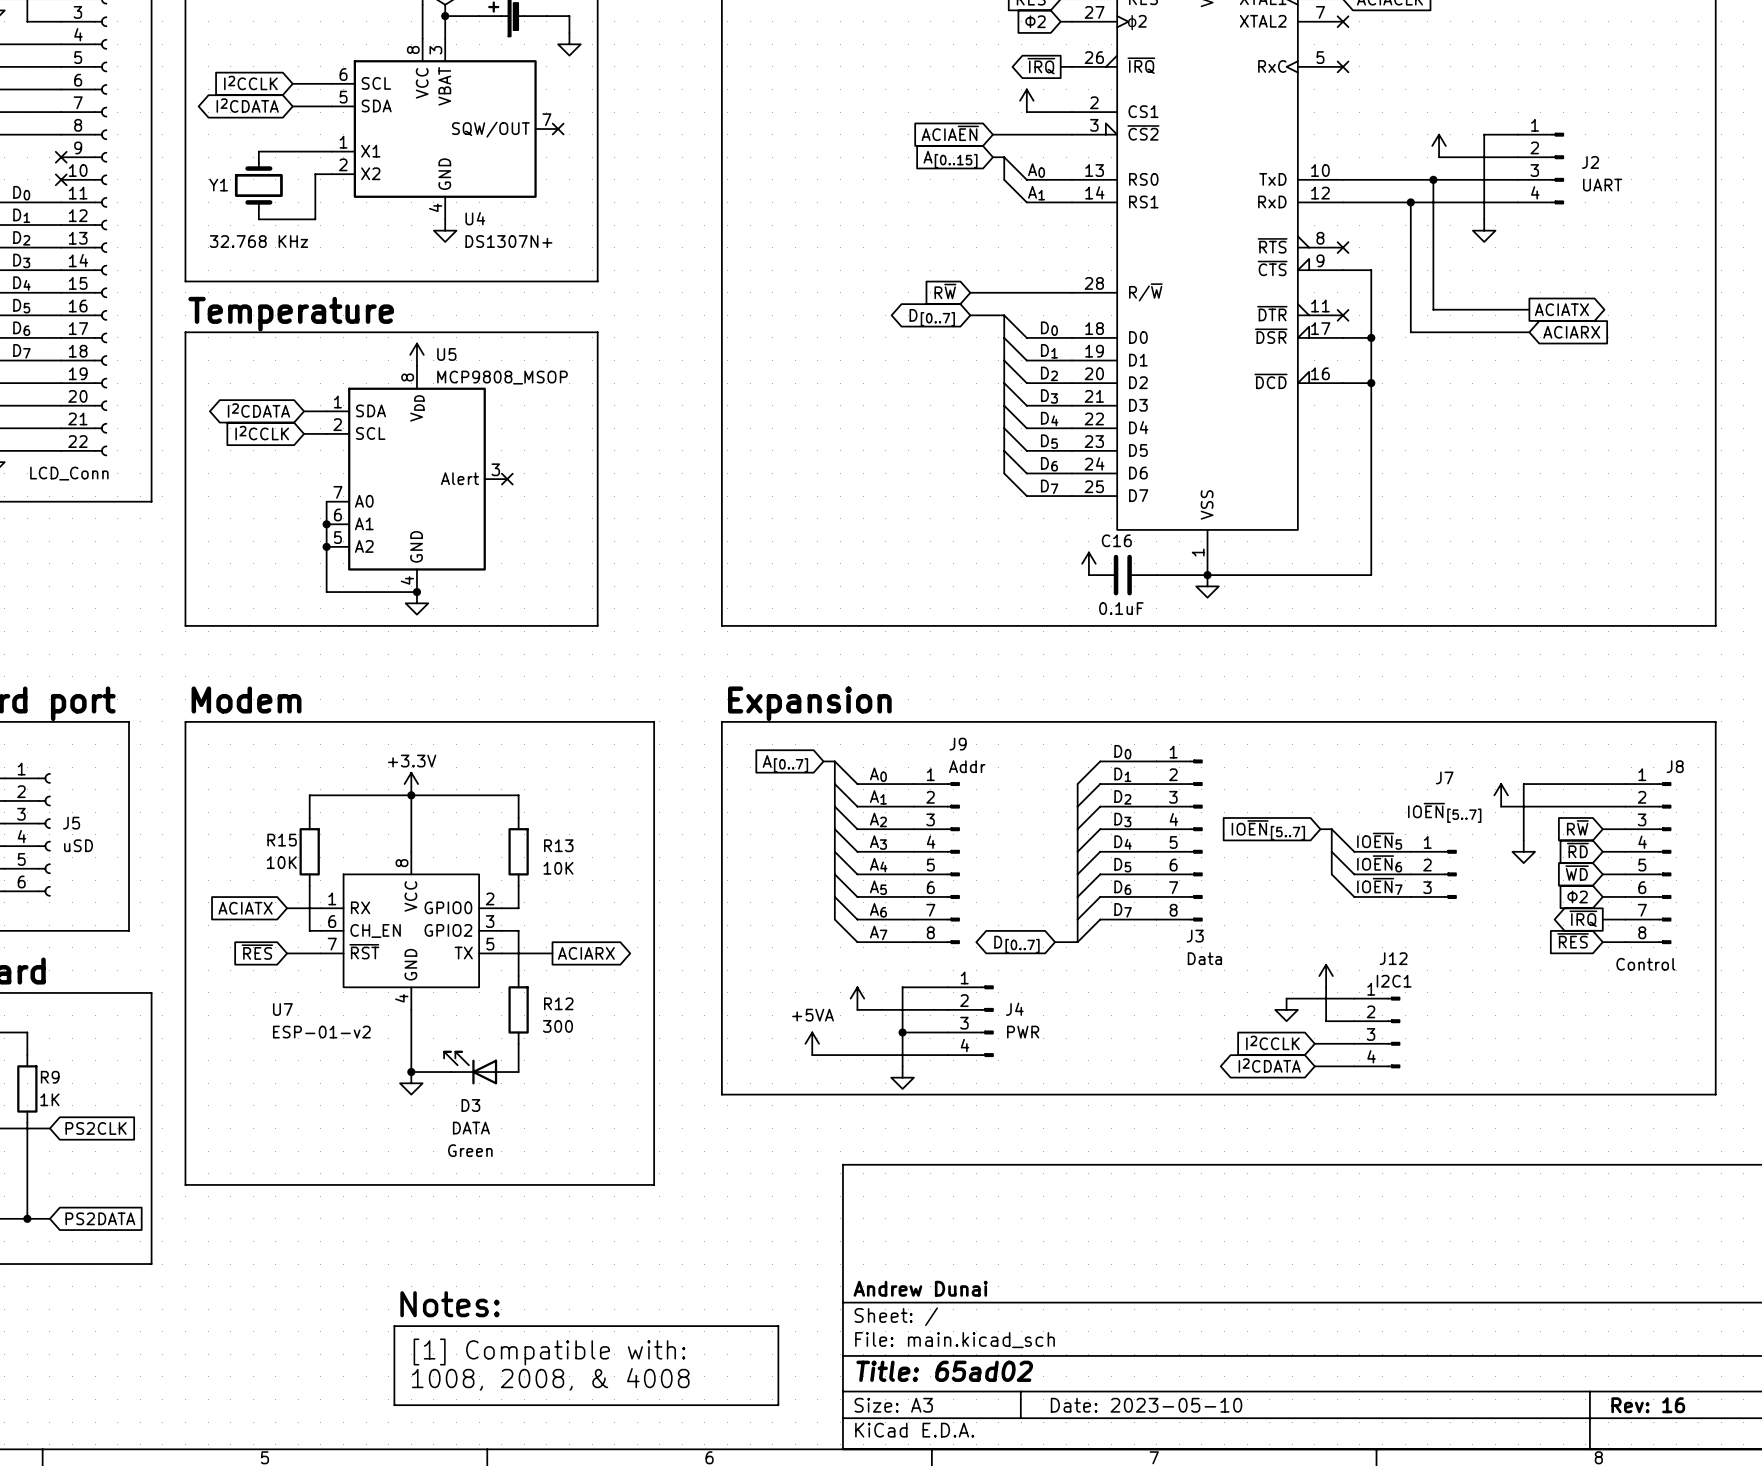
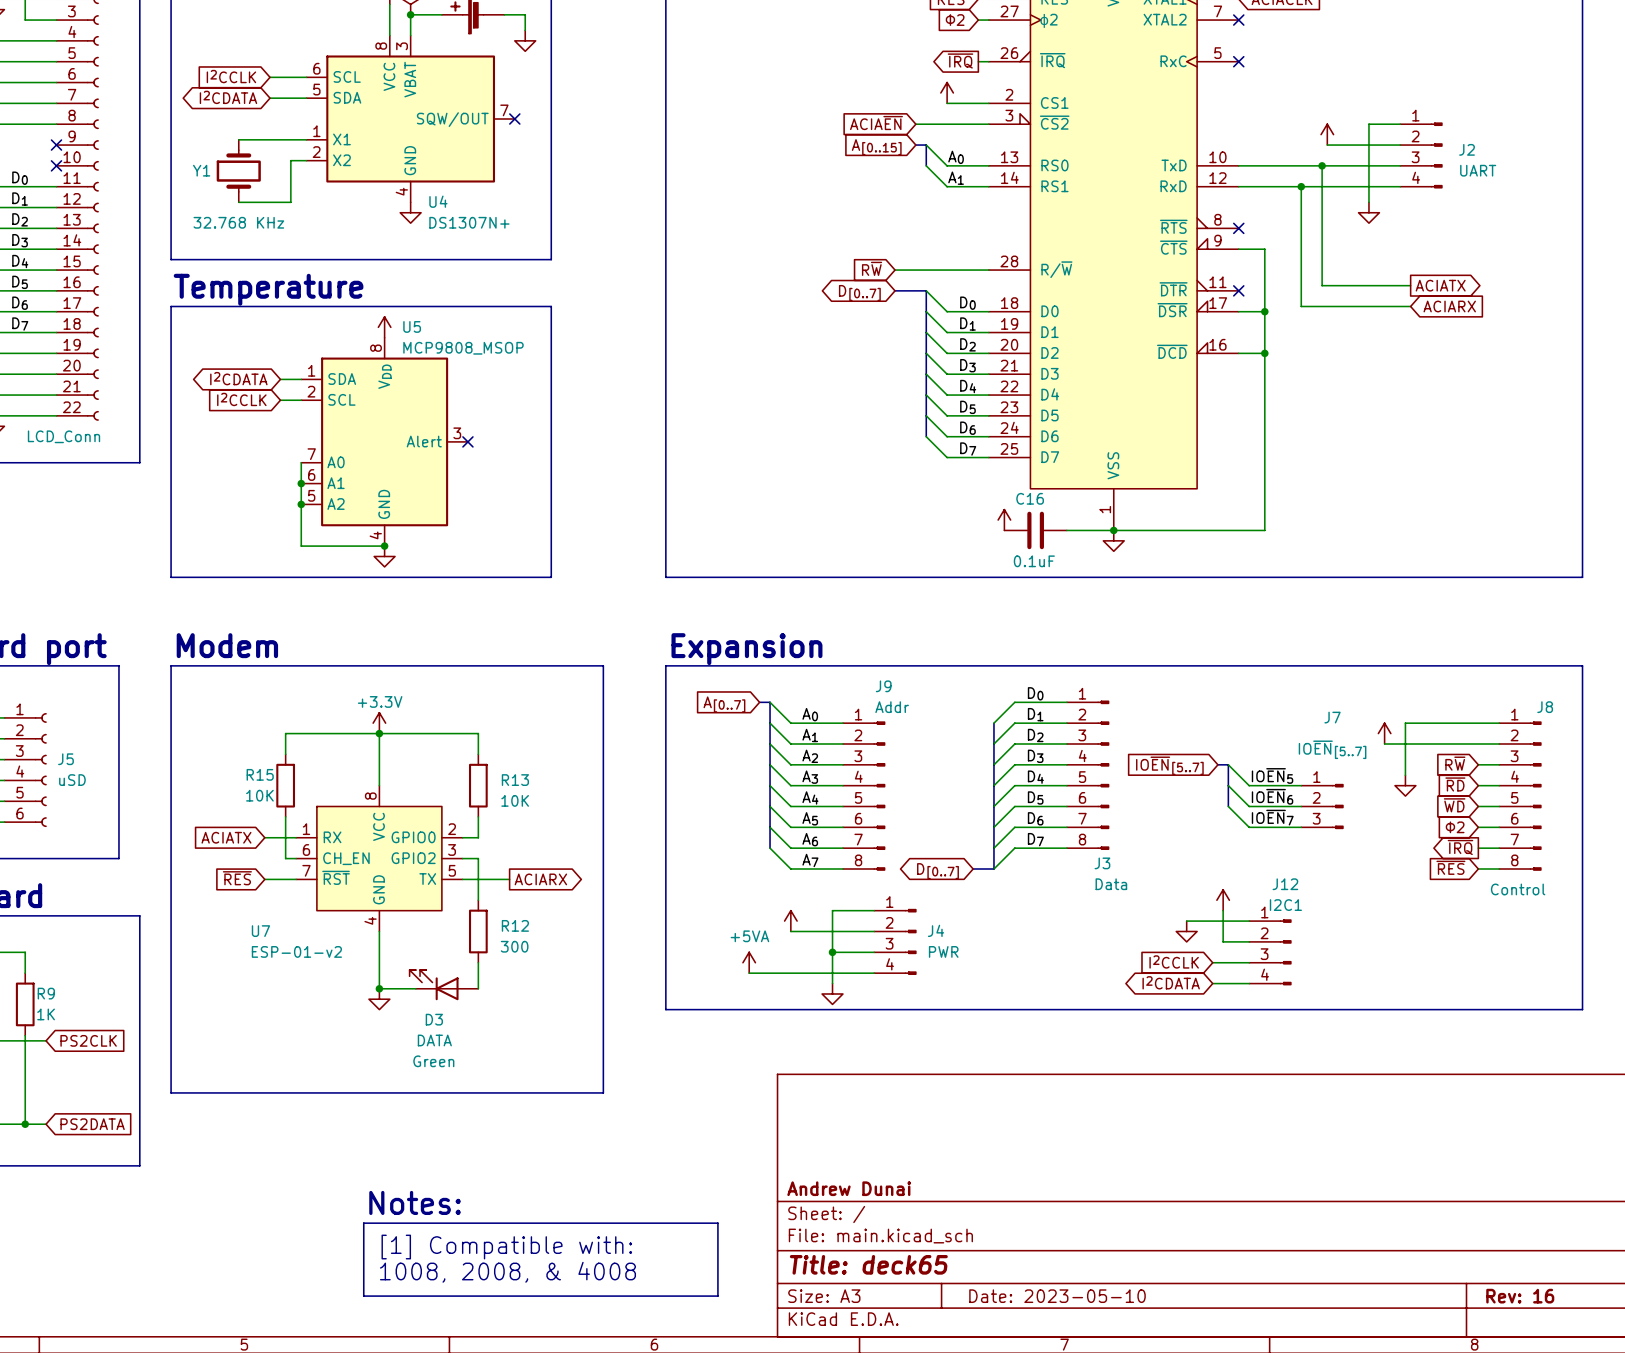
title block: Title: 65ad02 (944, 1371) -> Title: deck65 (868, 1264)

